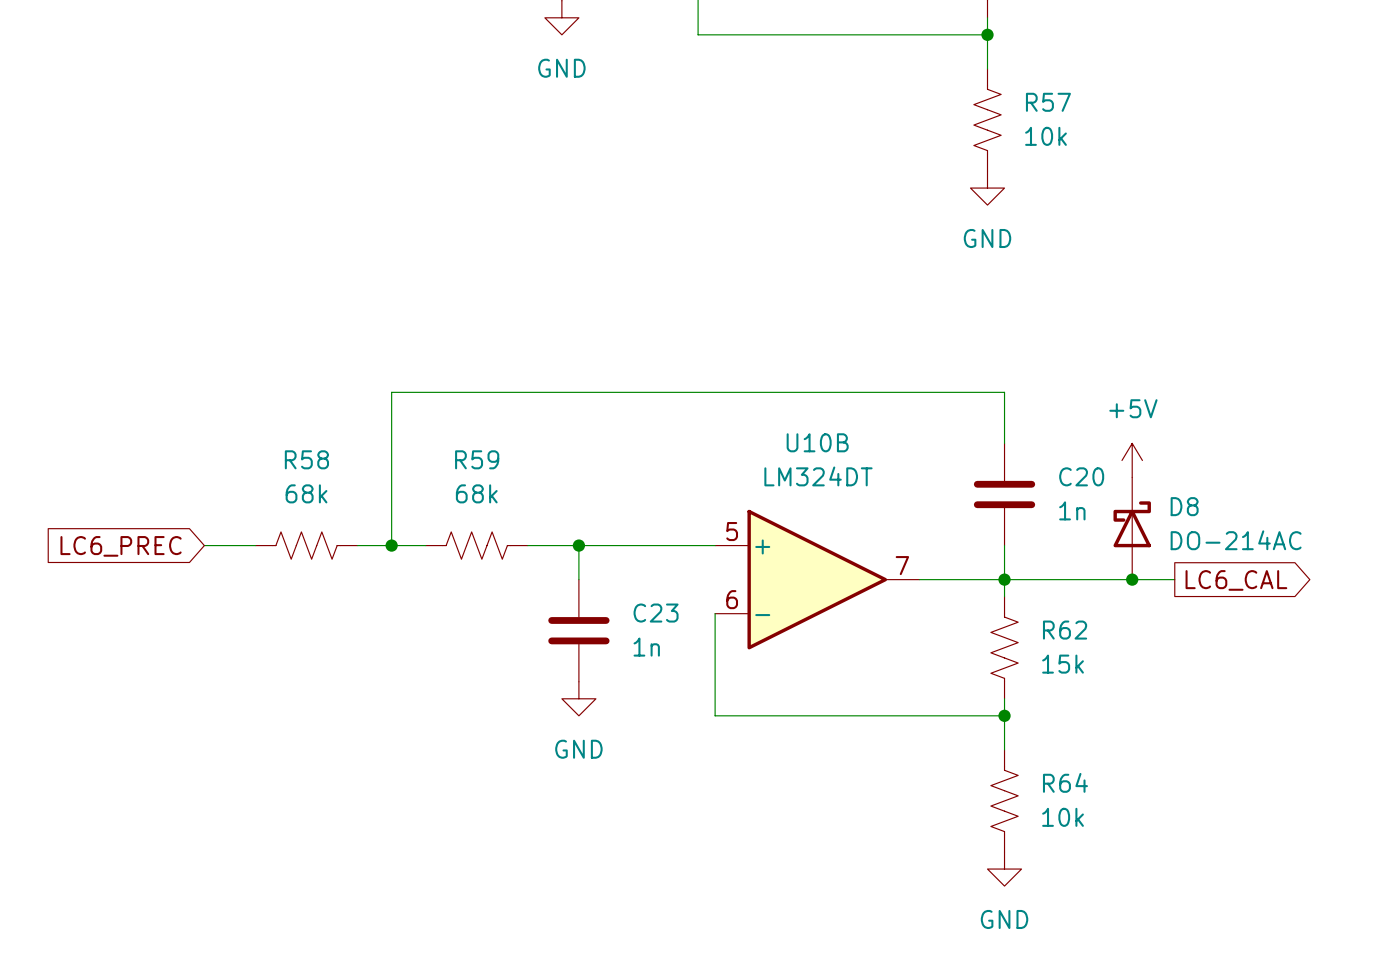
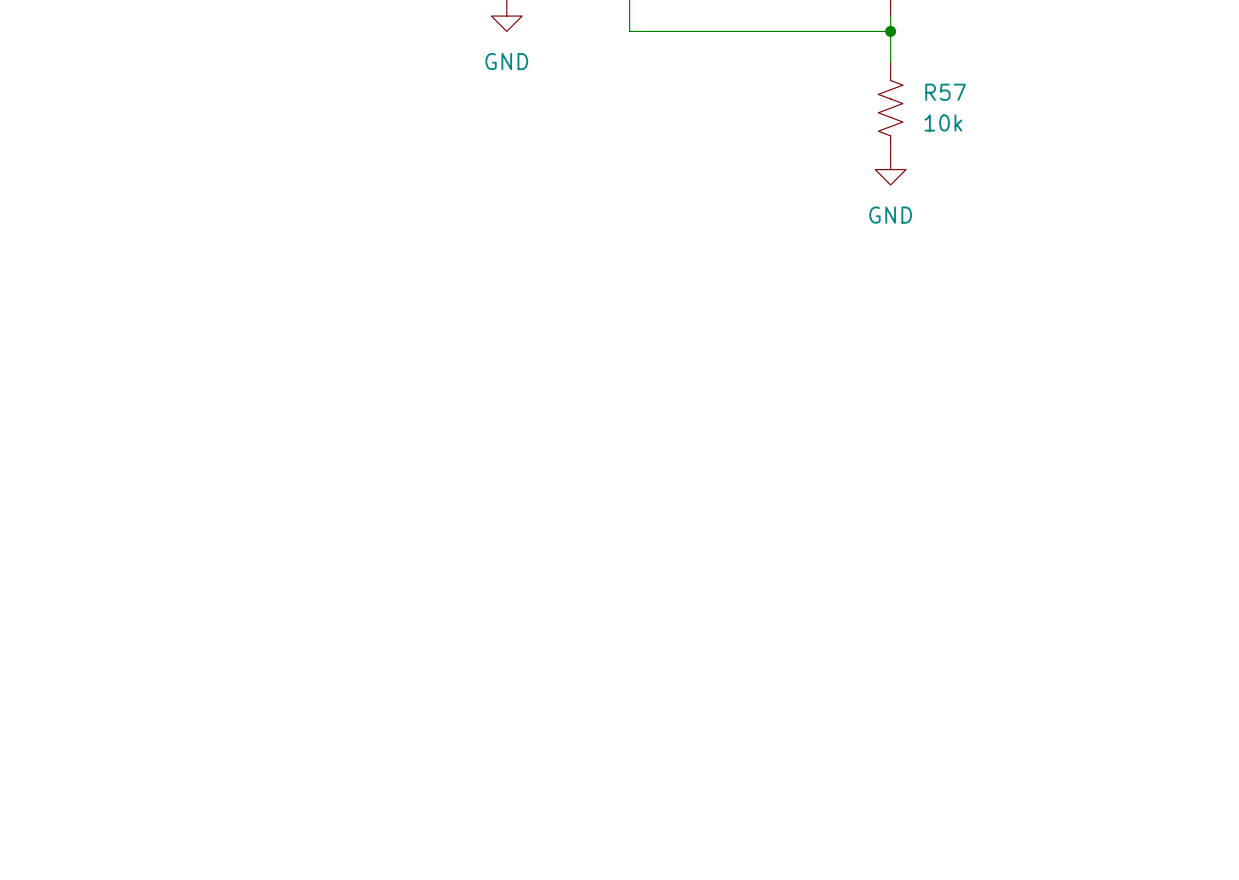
wire: (1004, 443) (1004, 392) (391, 392) (391, 545) -> none
power symbol: +5V (1132, 460) -> none
C20: 1n (1004, 494) -> none
D8: DO-214AC (1132, 528) -> none
wire: (204, 545) (255, 545) -> none
R58: 68k (306, 545) -> none
wire: (357, 545) (425, 545) -> none
junction: (391, 545) -> none
R59: 68k (476, 545) -> none
wire: (527, 545) (715, 545) -> none
wire: (578, 545) (578, 579) -> none
junction: (578, 545) -> none
wire: (1004, 545) (1004, 596) -> none
global label: LC6_PREC (121, 546) -> none
U10B: LM324DT (817, 579) -> none
wire: (919, 579) (1174, 579) -> none
junction: (1004, 579) -> none
junction: (1132, 579) -> none
global label: LC6_CAL (1236, 580) -> none
wire: (715, 613) (715, 715) (1004, 715) -> none
C23: 1n (578, 630) -> none
R62: 15k (1004, 647) -> none
power symbol: GND (578, 698) -> none
wire: (1004, 698) (1004, 749) -> none
junction: (1004, 715) -> none
R64: 10k (1004, 800) -> none
power symbol: GND (1004, 869) -> none

